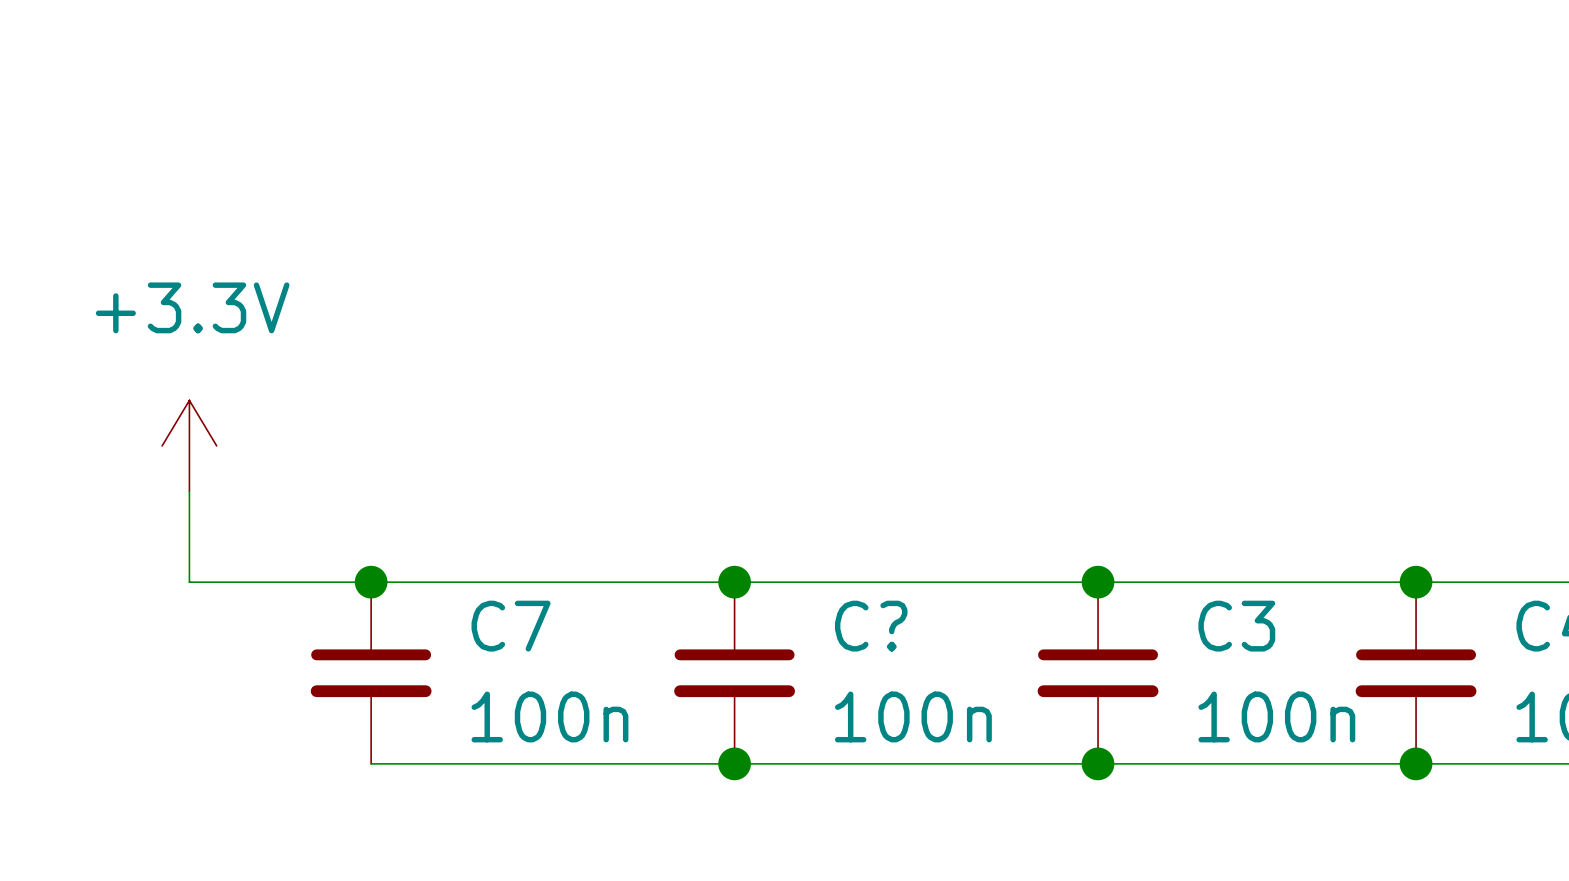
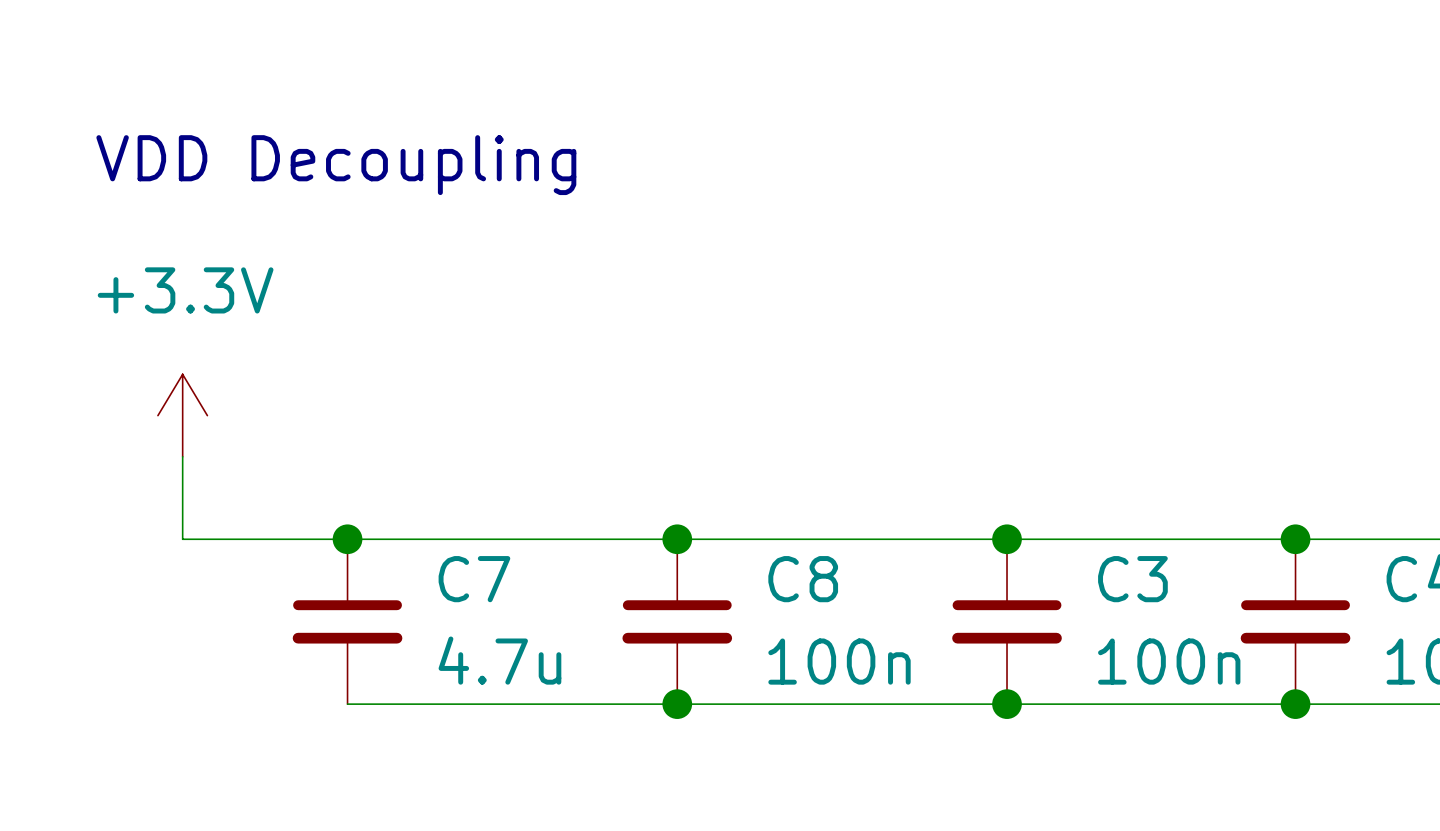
text: none -> VDD Decoupling (336, 165)
C? name: C? (871, 626) -> C8 (803, 579)
C7 value: 100n (549, 716) -> 4.7u (499, 660)

